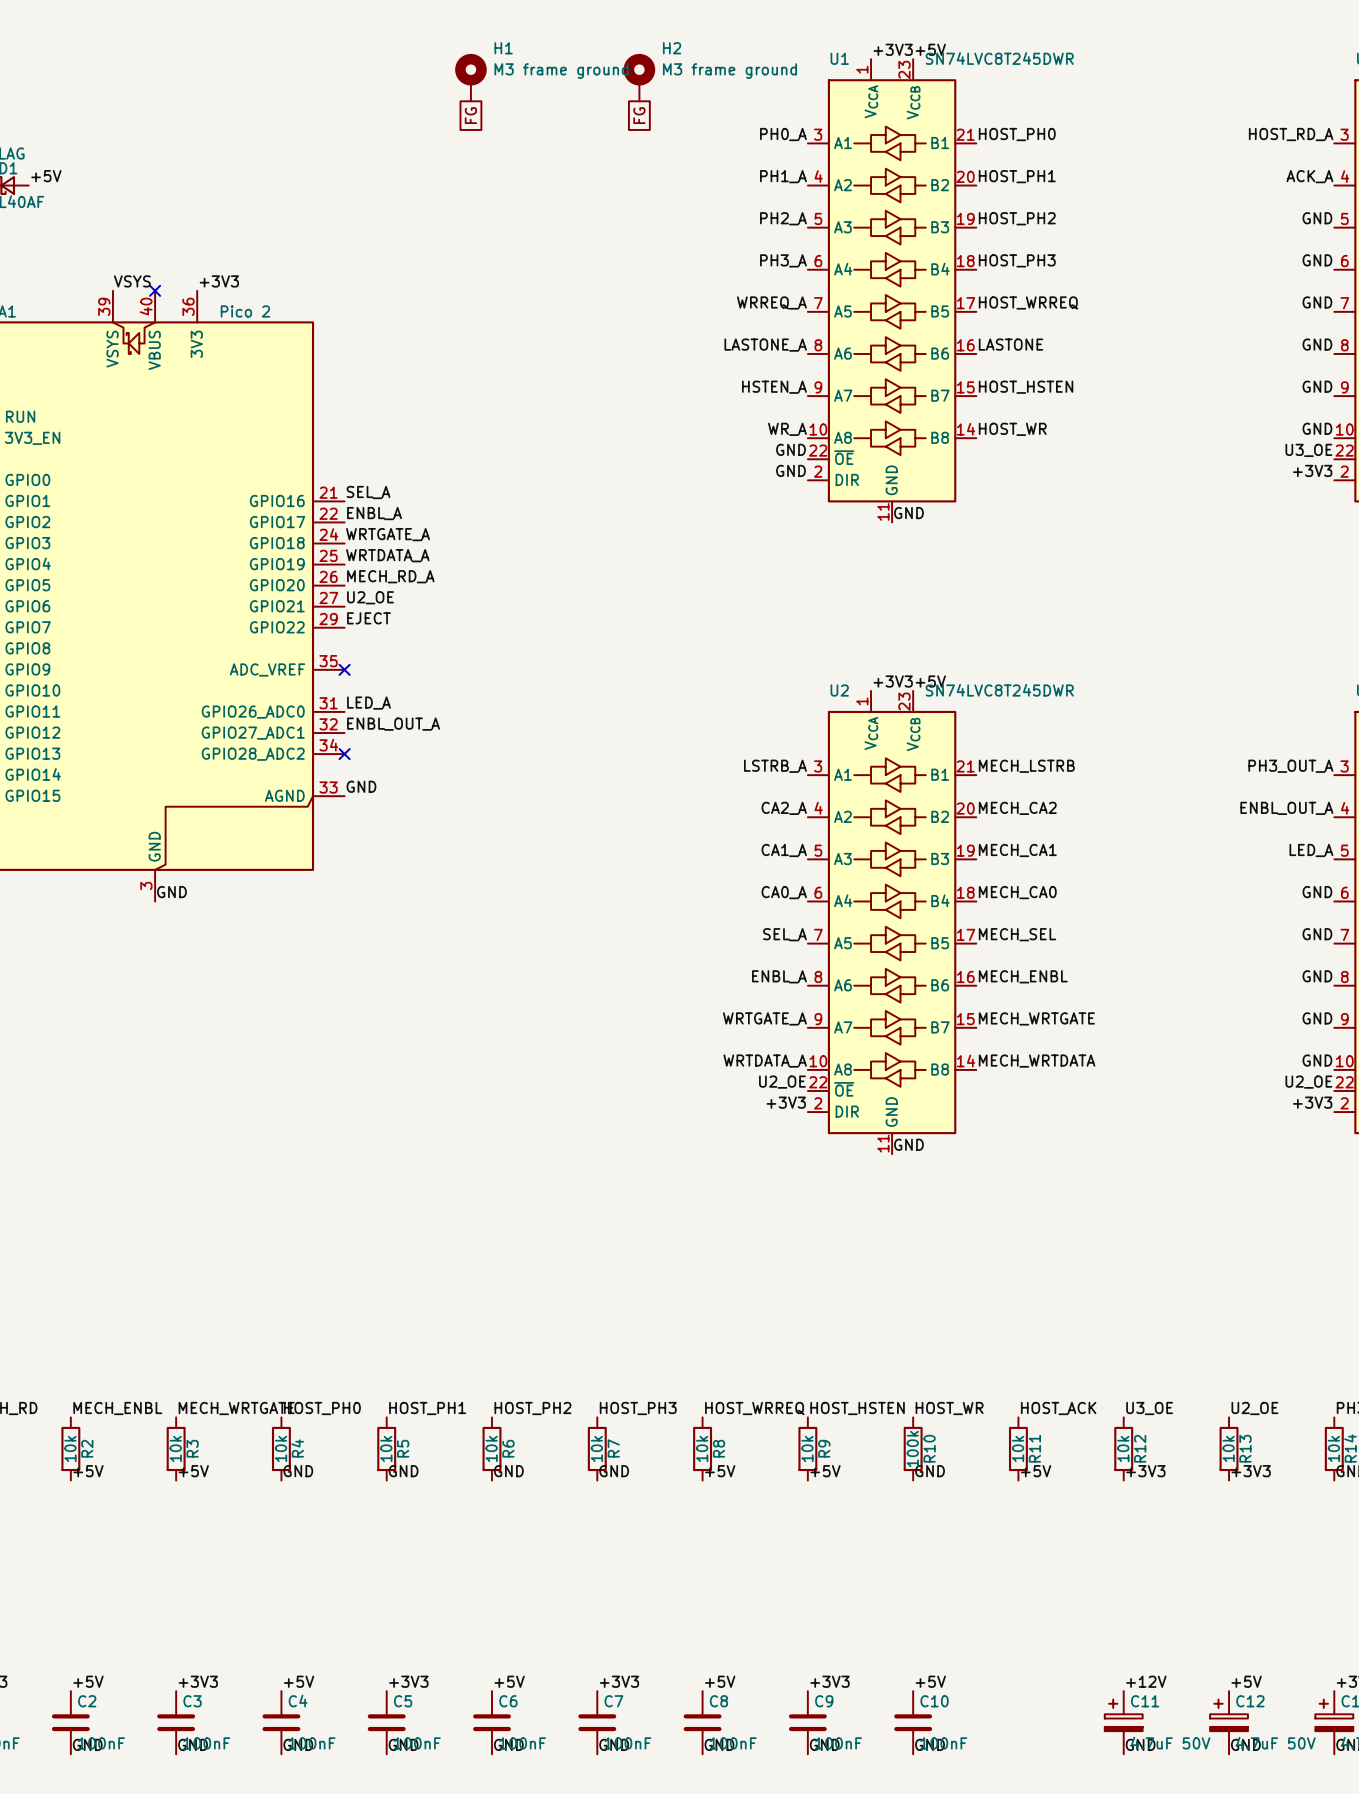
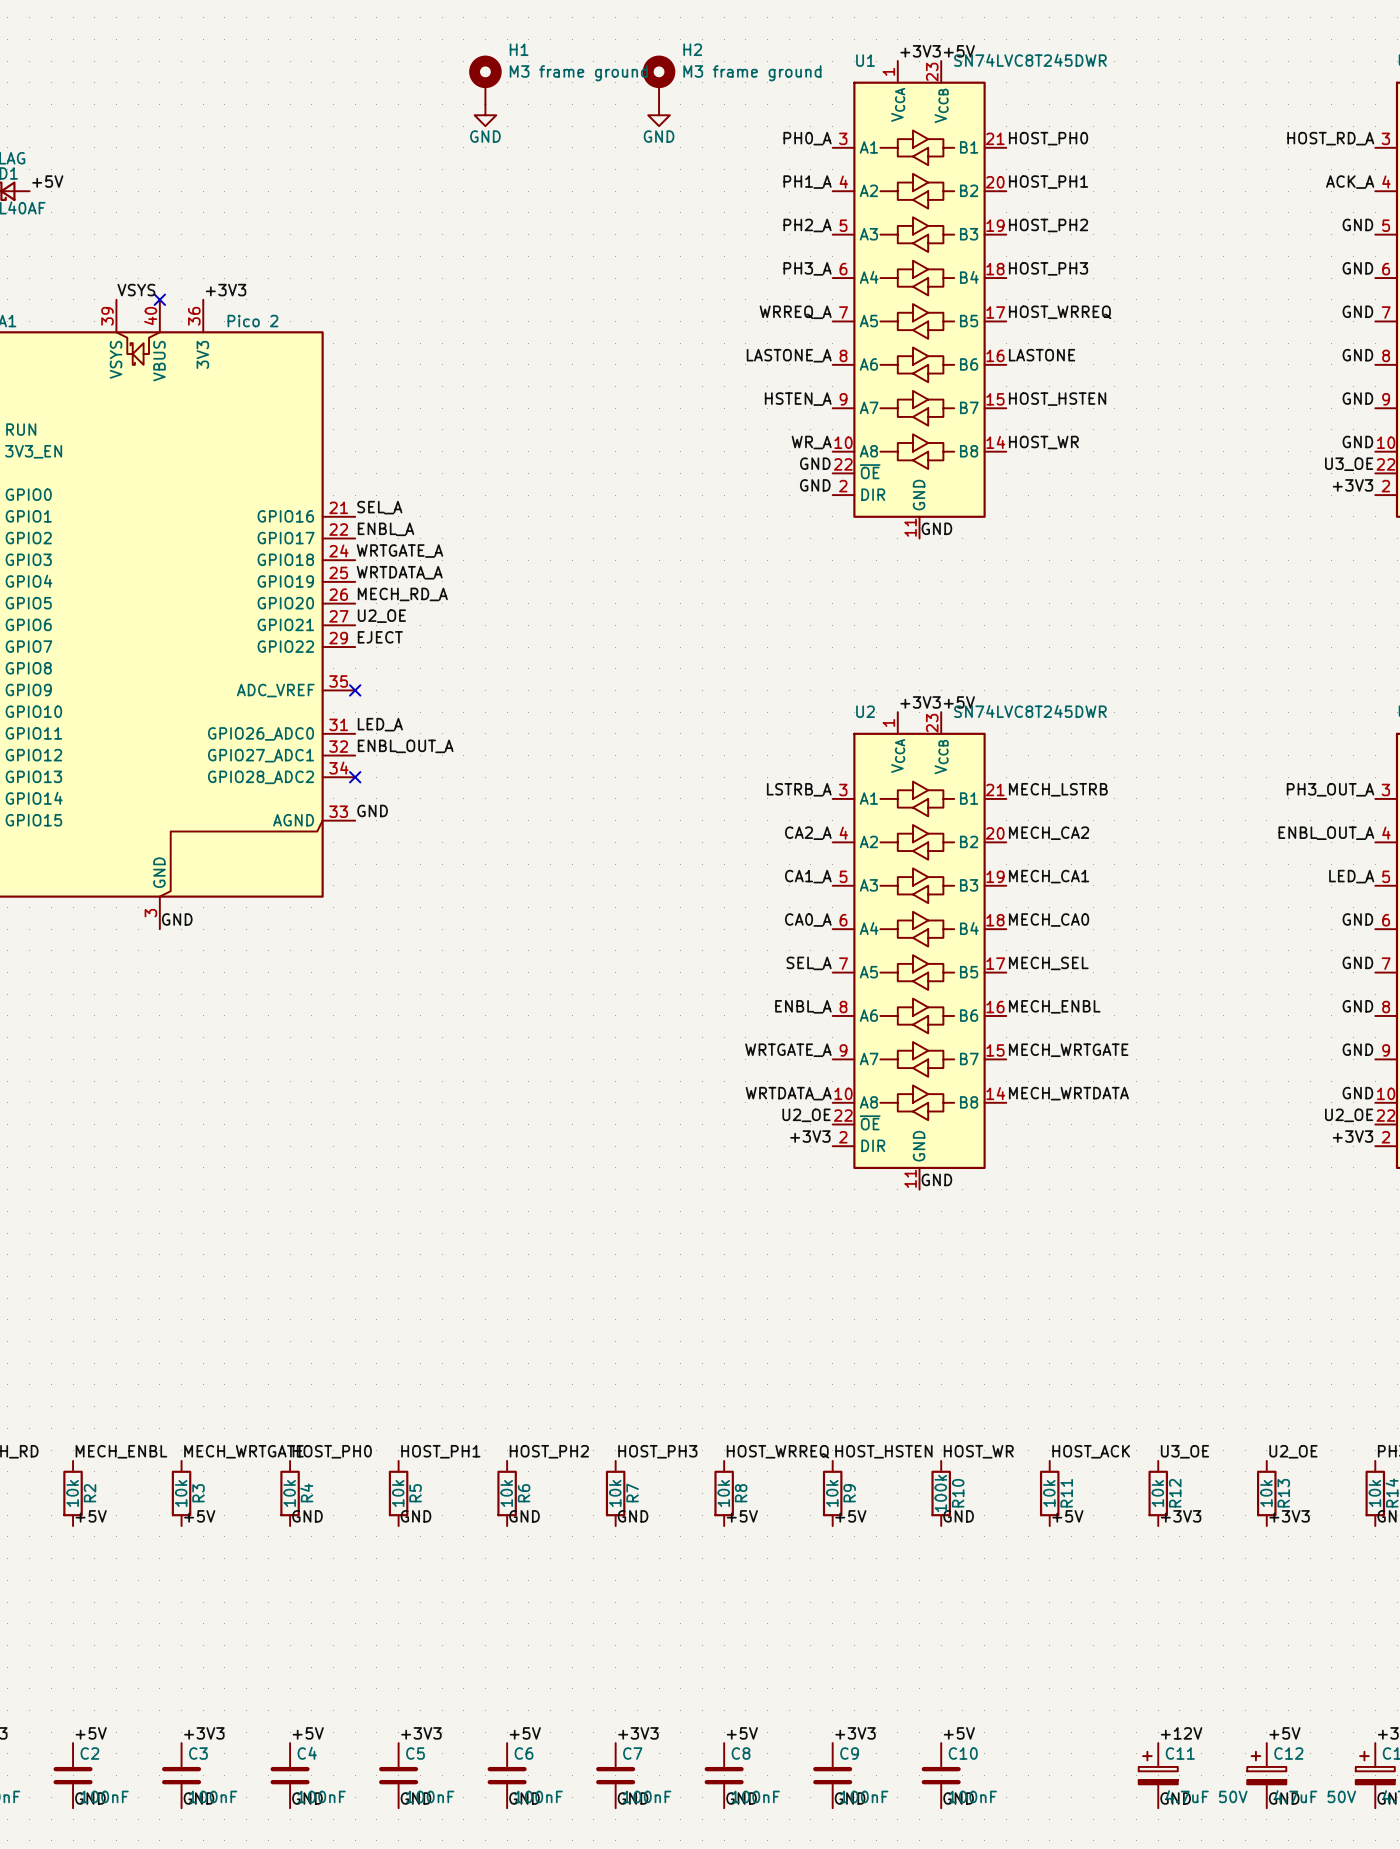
power symbol: none -> GND (485, 115)
power symbol: none -> GND (659, 115)
global label: FG (470, 115) -> none
global label: FG (639, 115) -> none

